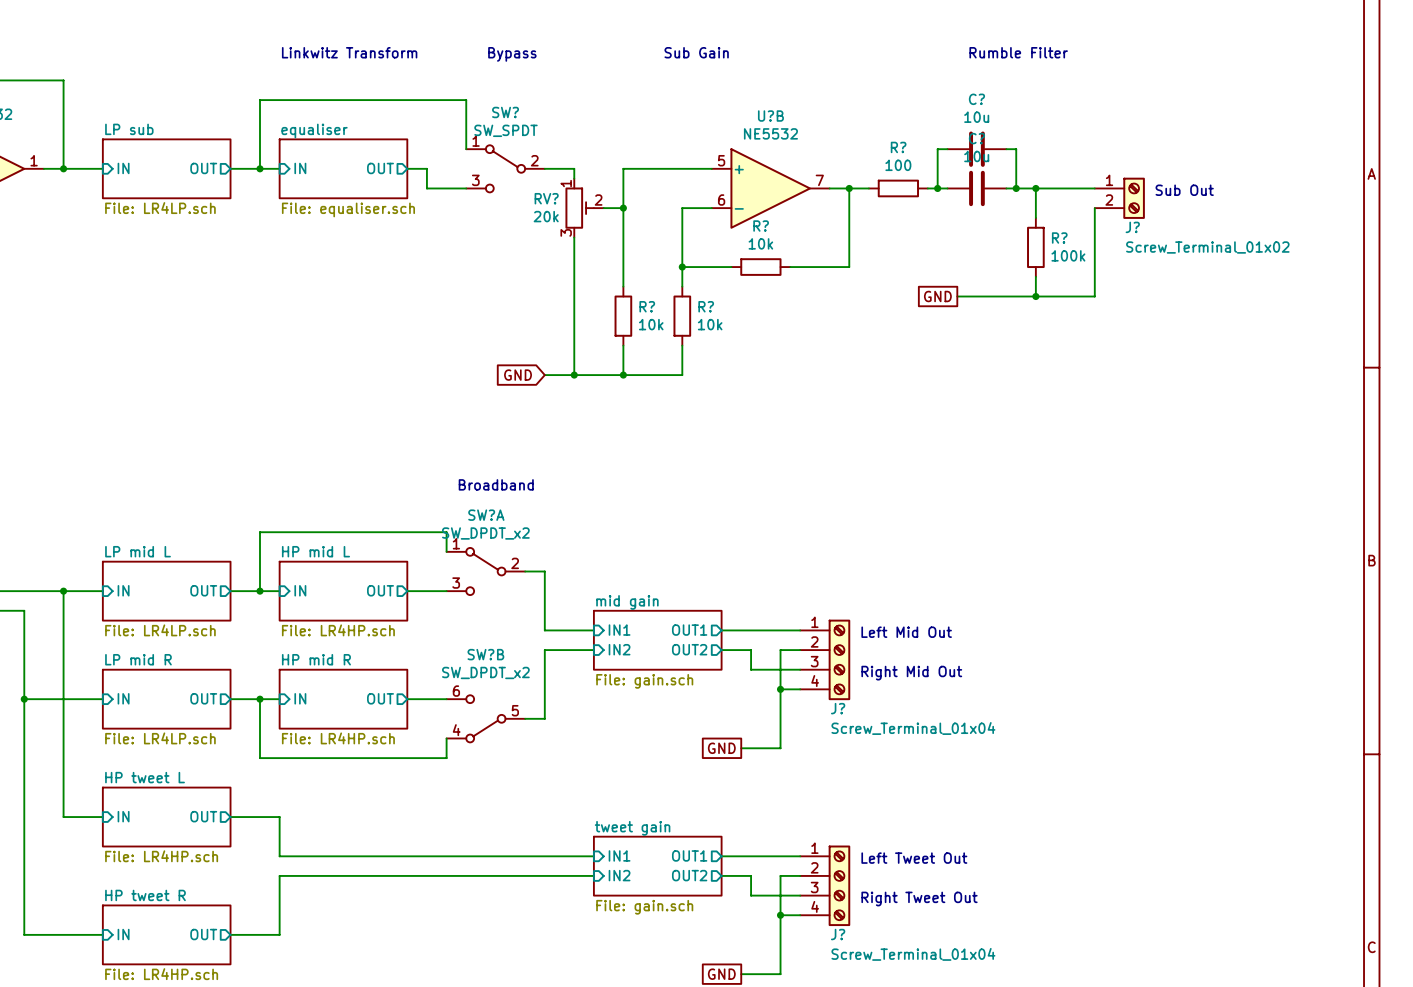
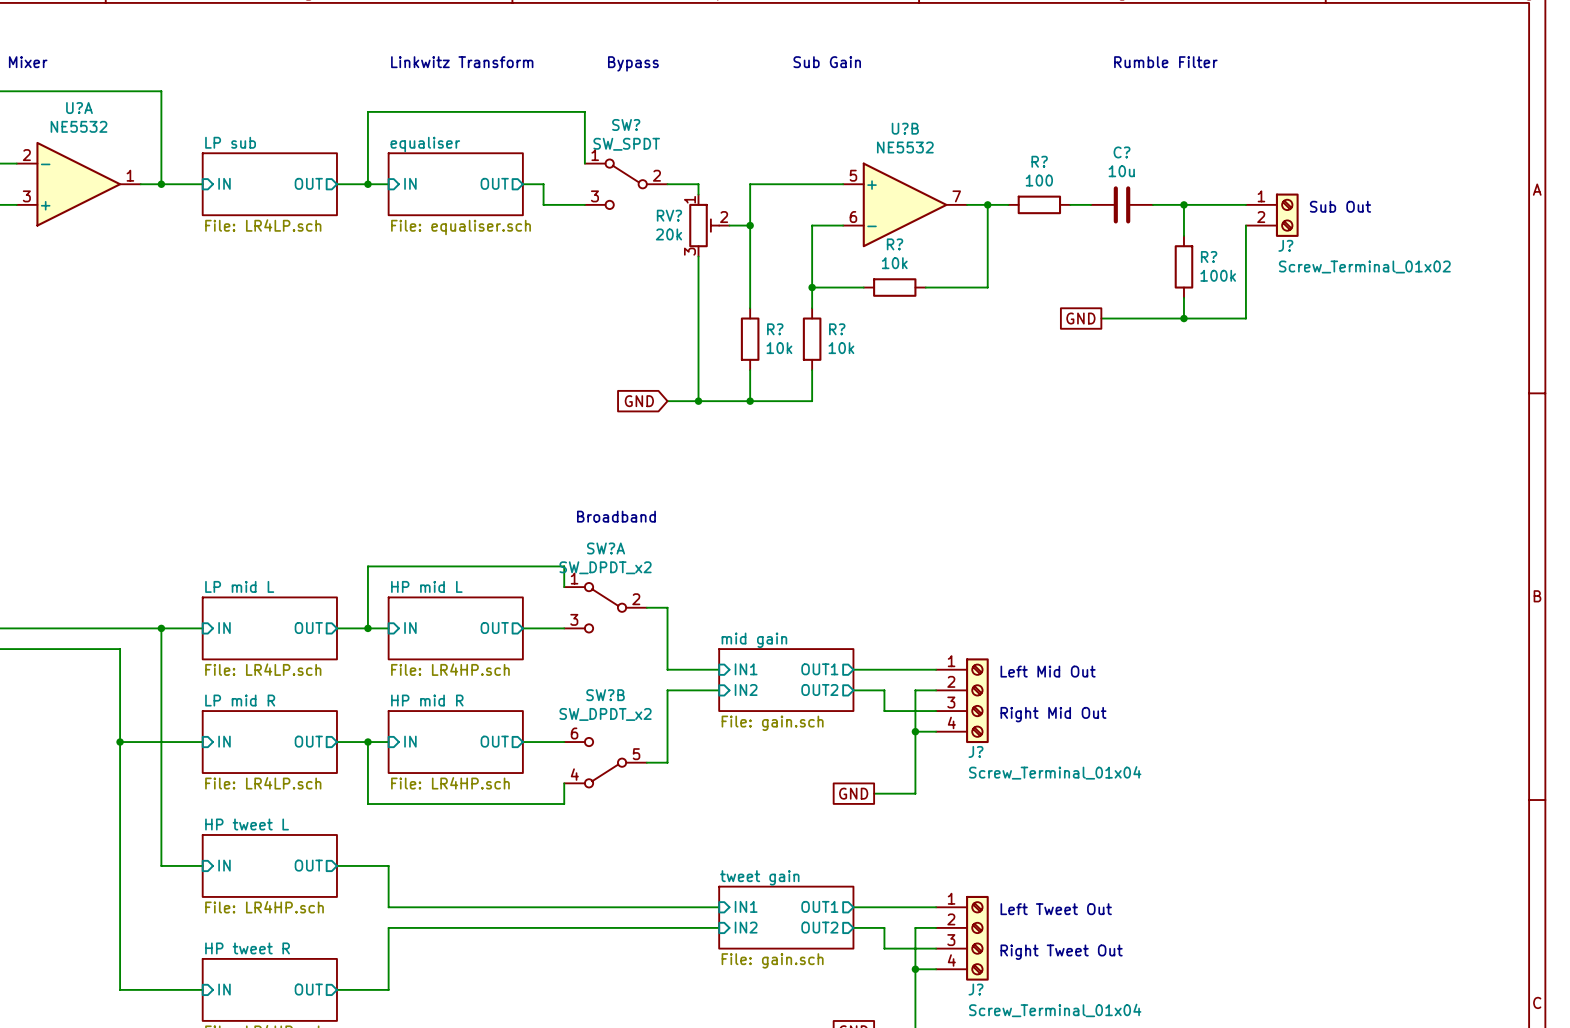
wire: (947, 149) (937, 149) (937, 188) -> none
C?: 10u (976, 149) -> none
wire: (1006, 149) (1016, 149) (1016, 188) -> none
junction: (937, 188) -> none
junction: (1016, 188) -> none

